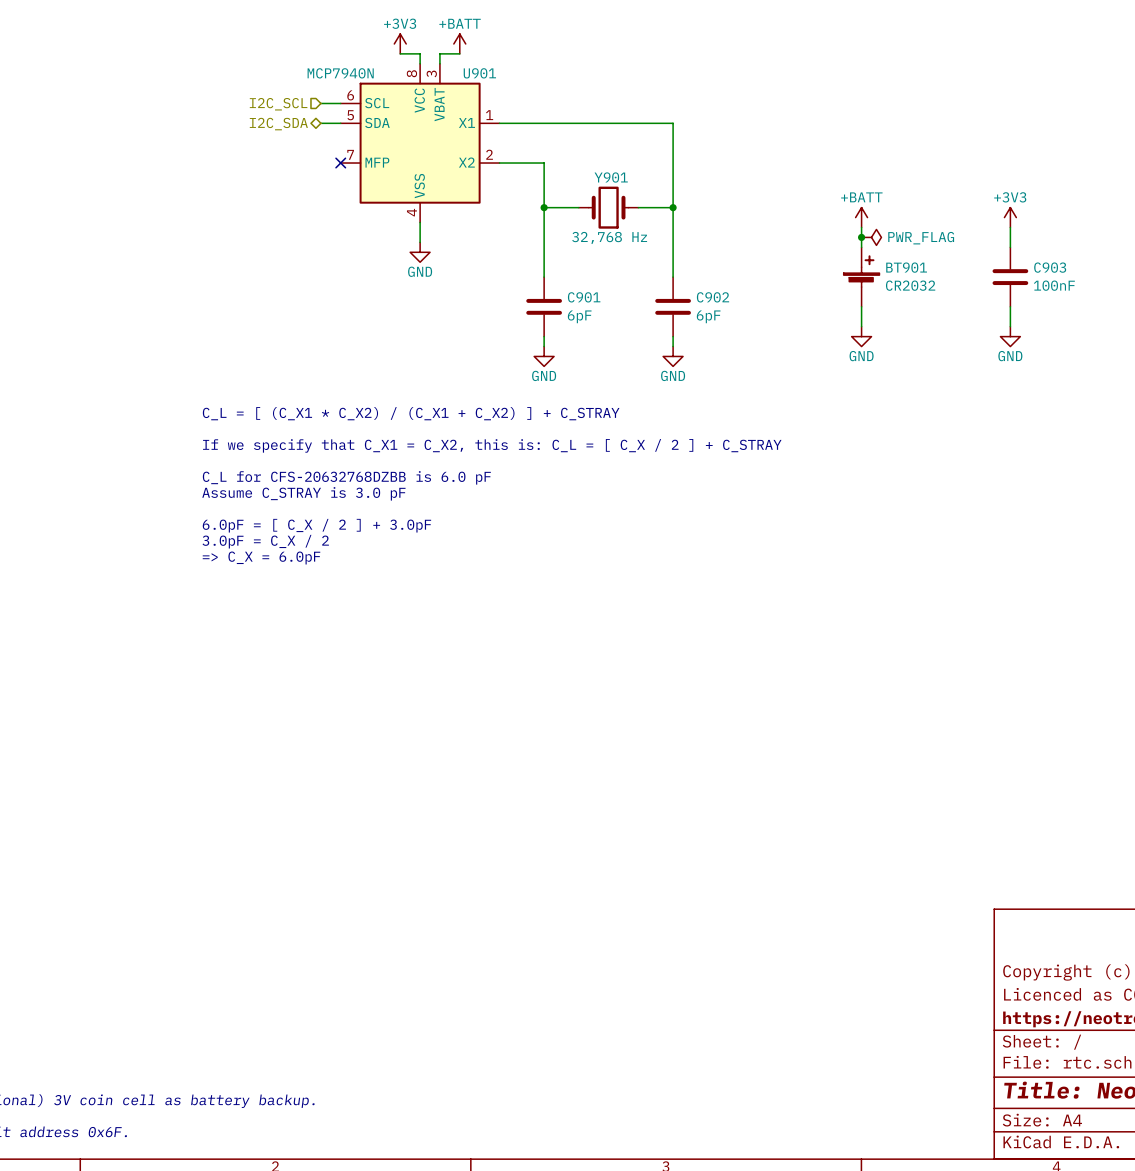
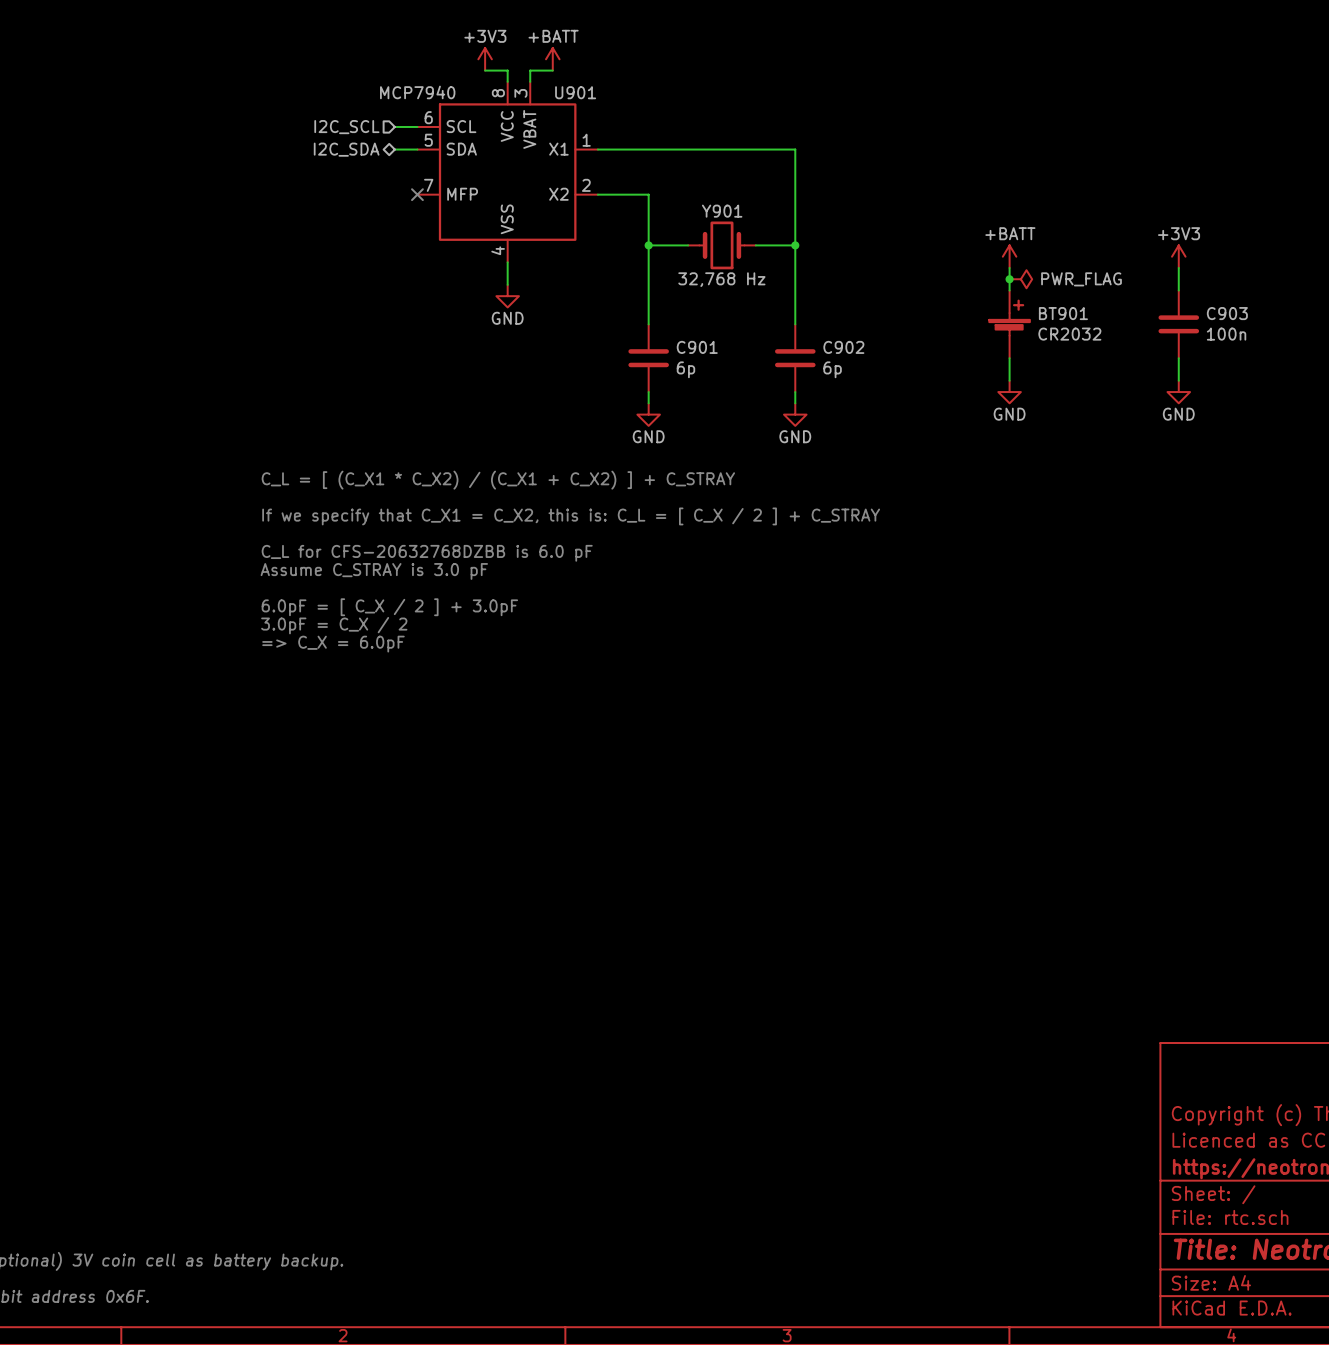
U901 value: MCP7940N (340, 73) -> MCP7940 (417, 92)
C903 value: 100nF (1054, 285) -> 100n (1226, 334)
C901 value: 6pF (579, 316) -> 6p (685, 369)
C902 value: 6pF (708, 316) -> 6p (832, 369)

